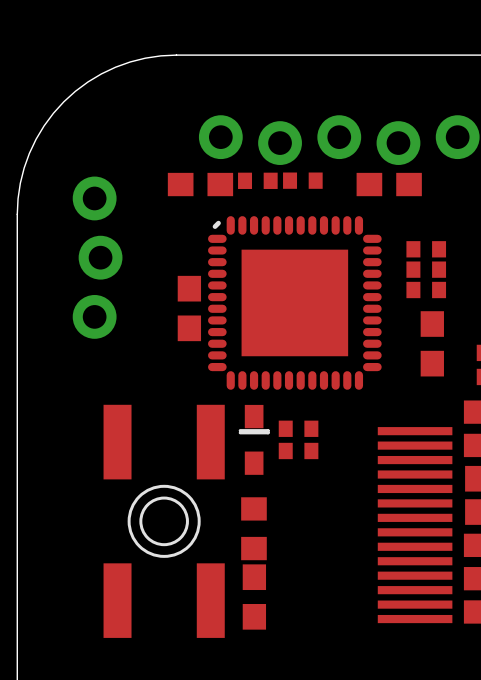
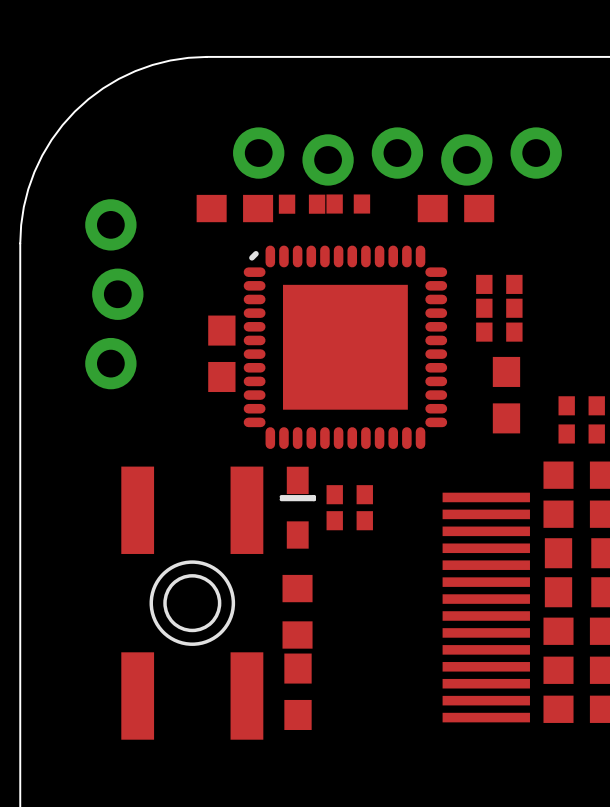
part footprint: [283, 172, 323, 189] -> [326, 194, 371, 214]

